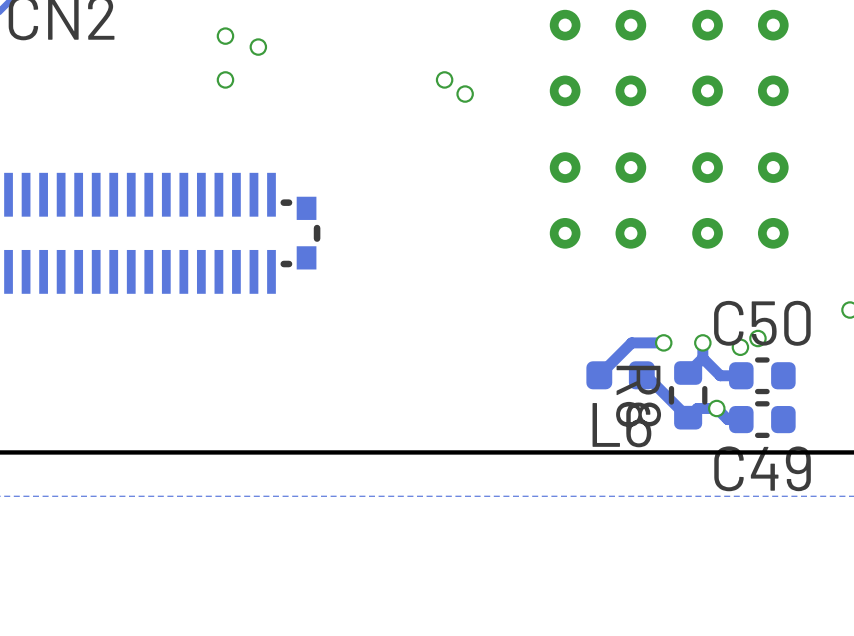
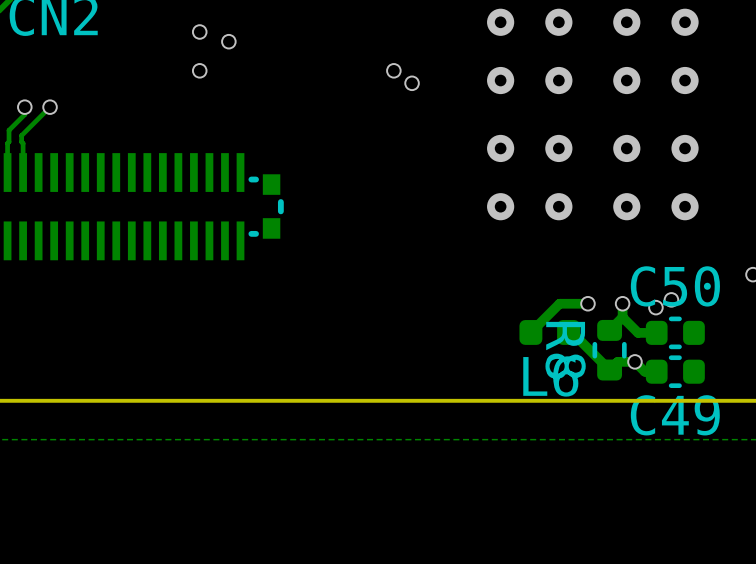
track: none -> (24, 107) (24, 114) (9, 130) (7, 172)
via: none -> (24, 107)
track: none -> (50, 107) (21, 135) (23, 172)
via: none -> (50, 107)

